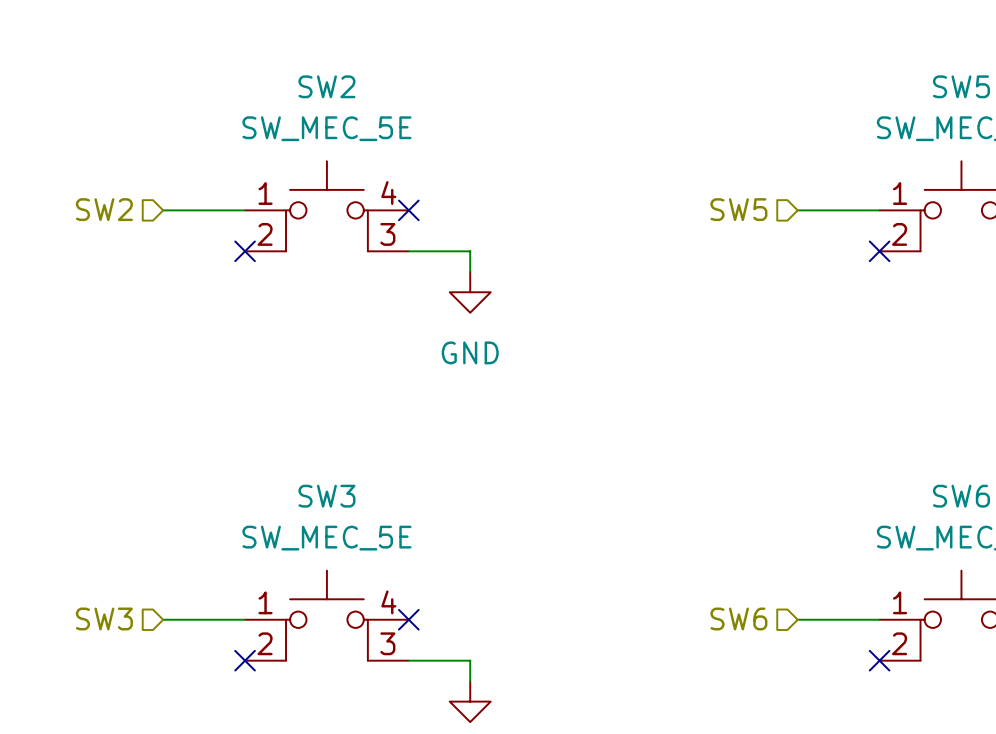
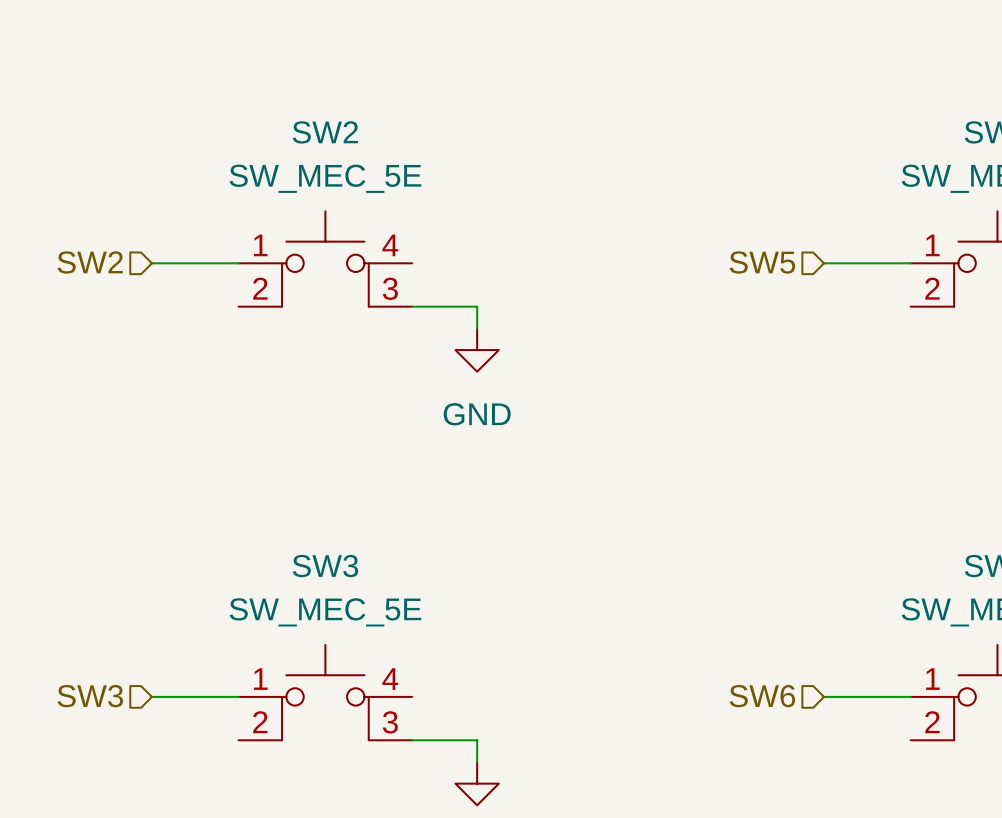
no-connect mark: (408, 210) -> none
no-connect mark: (245, 251) -> none
no-connect mark: (879, 251) -> none
no-connect mark: (408, 619) -> none
no-connect mark: (245, 660) -> none
no-connect mark: (879, 660) -> none

